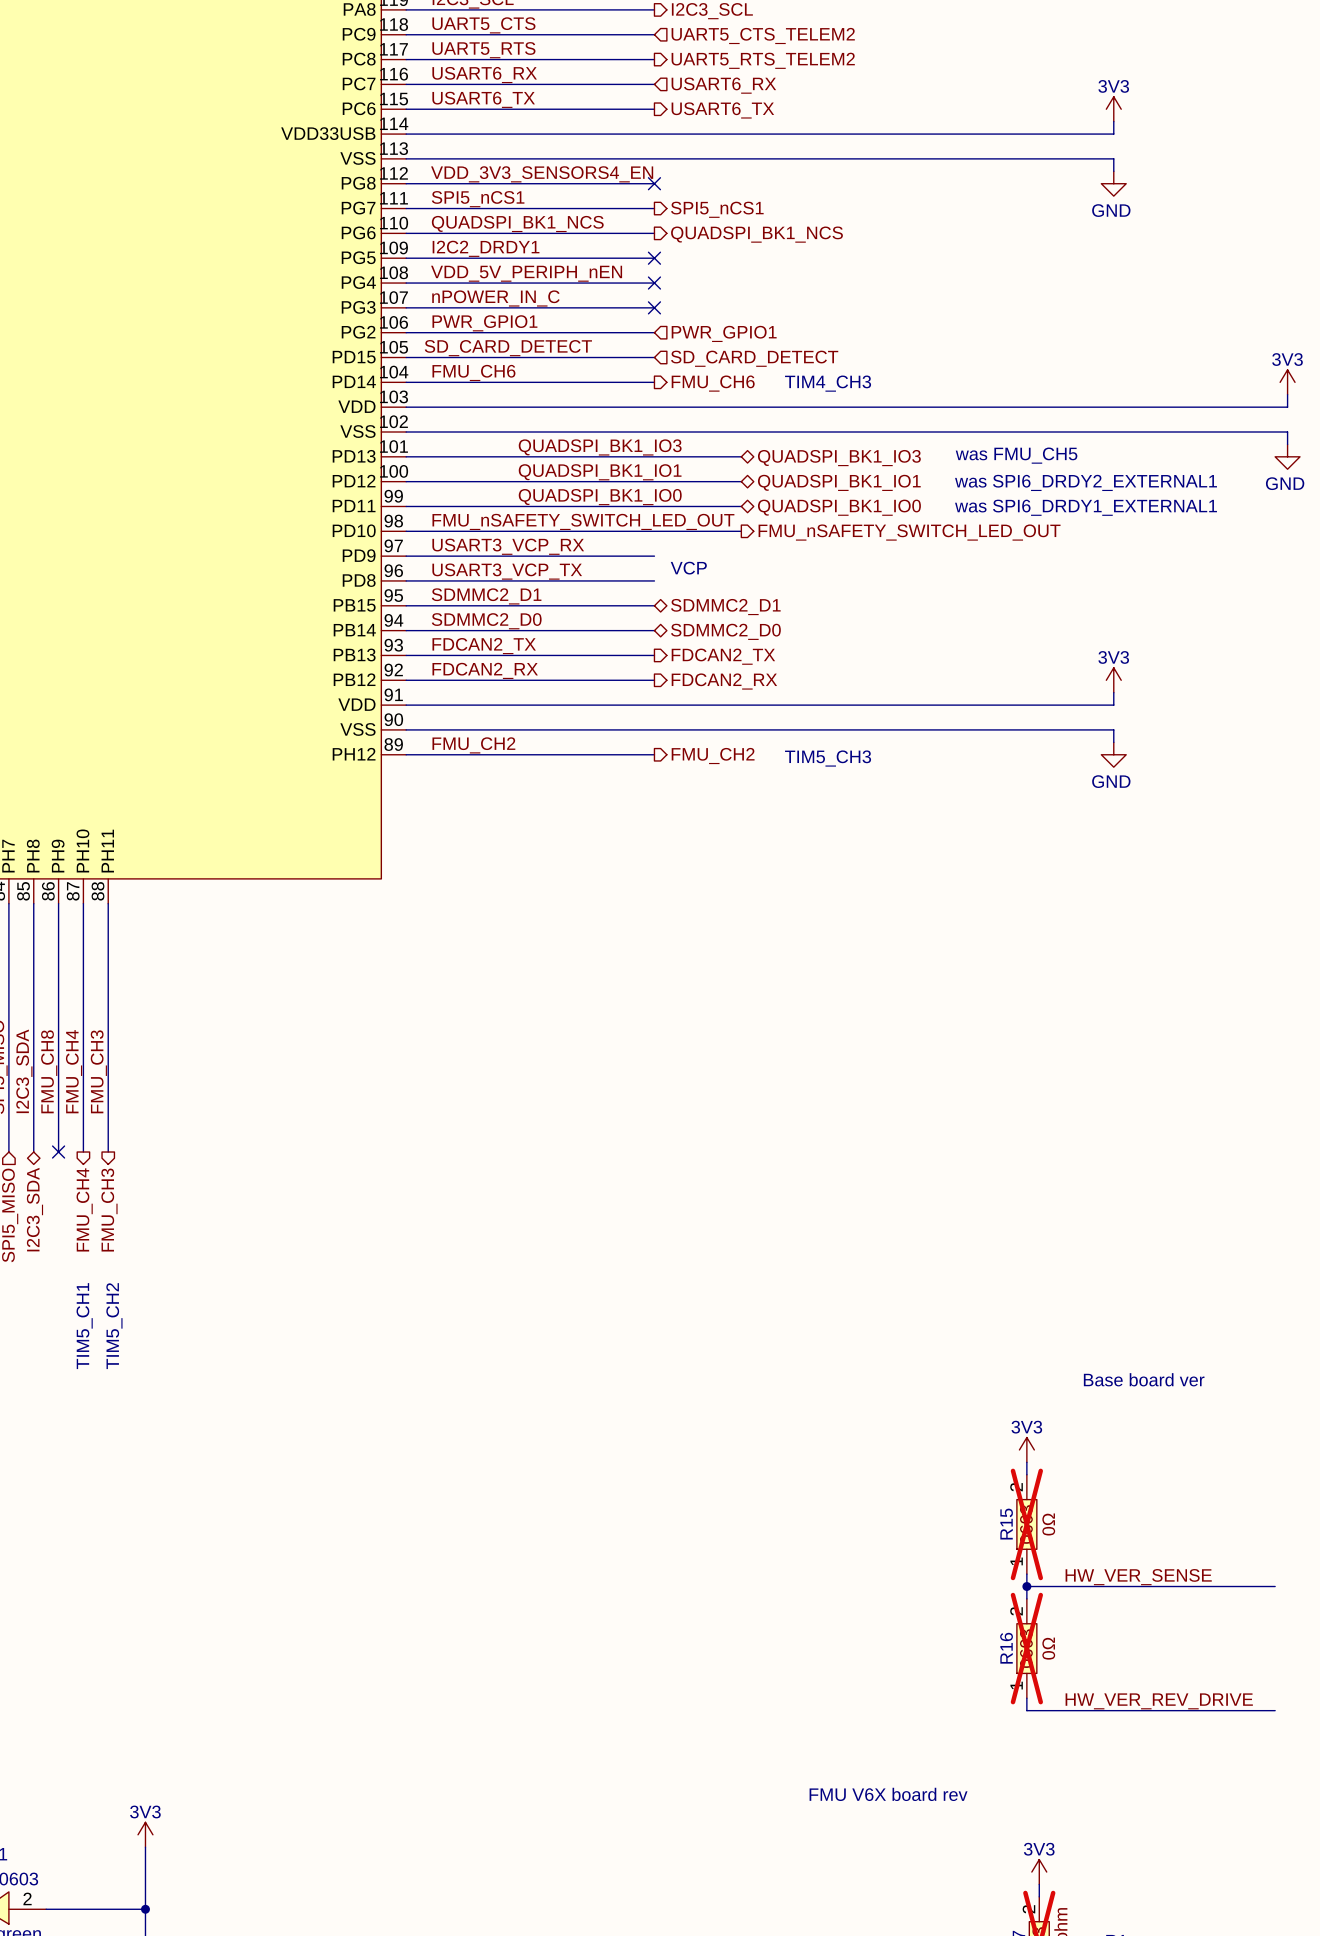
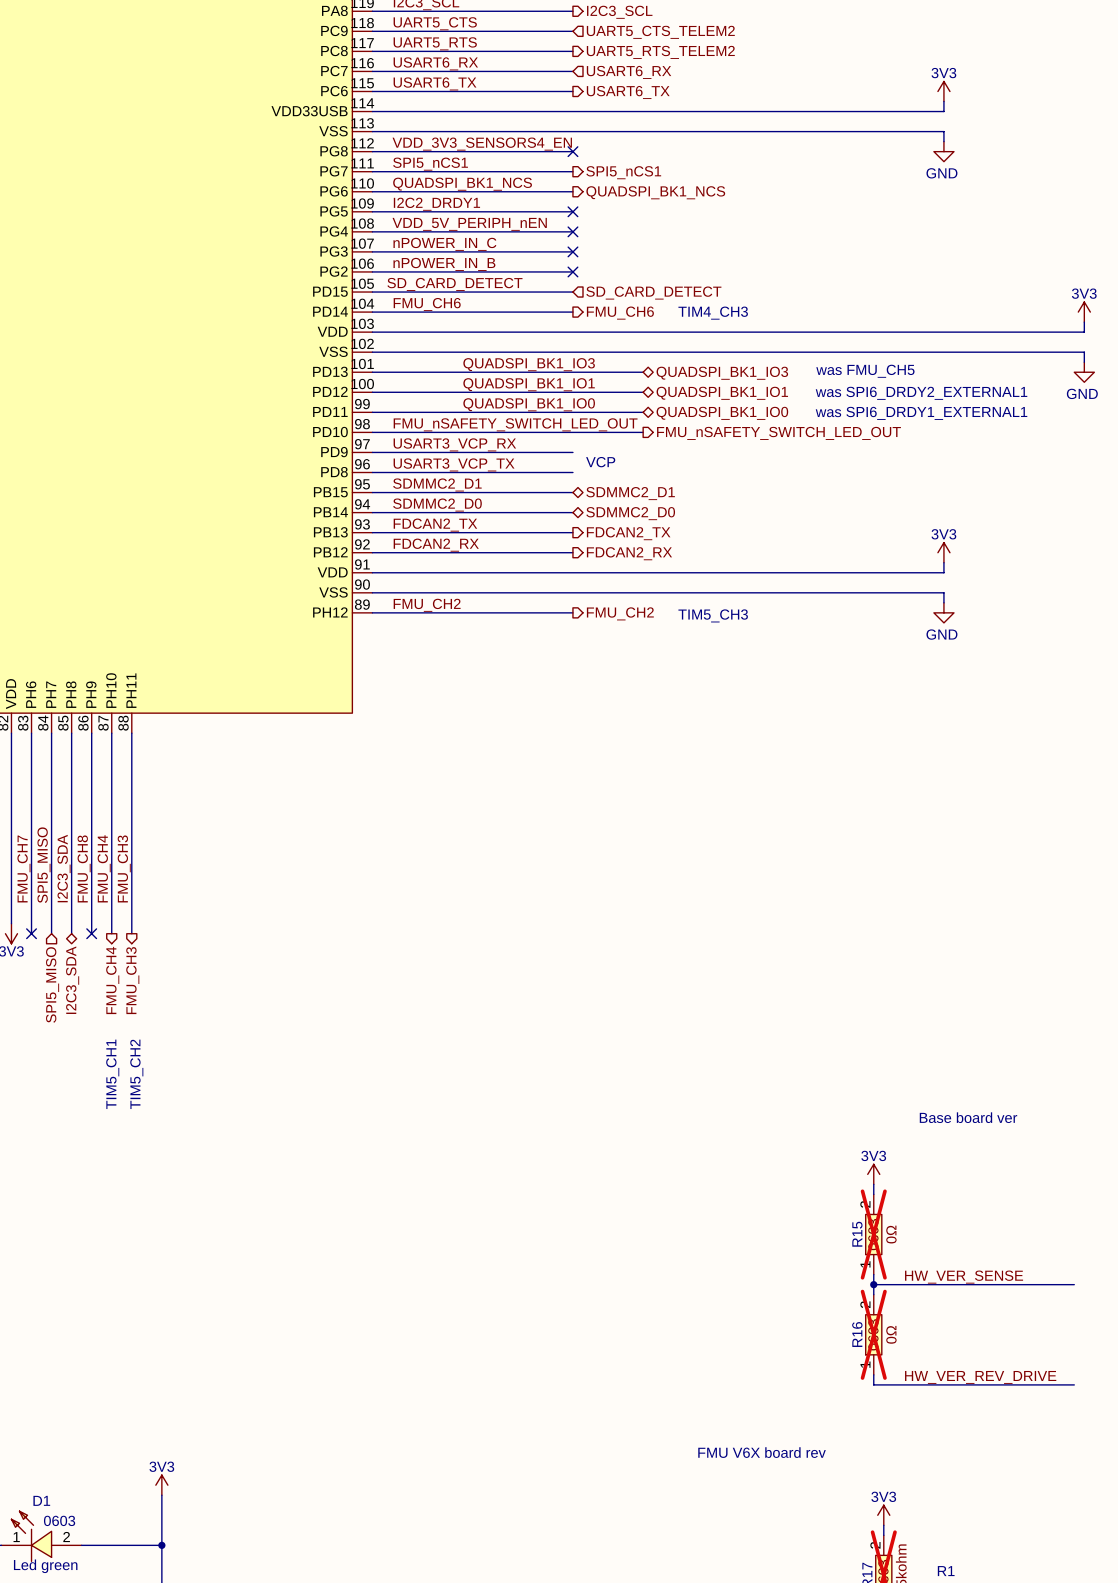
label: PWR_GPIO1 (484, 323) -> nPOWER_IN_B (444, 264)
no-connect mark: none -> (572, 271)
hierarchical label: PWR_GPIO1 (724, 333) -> none

